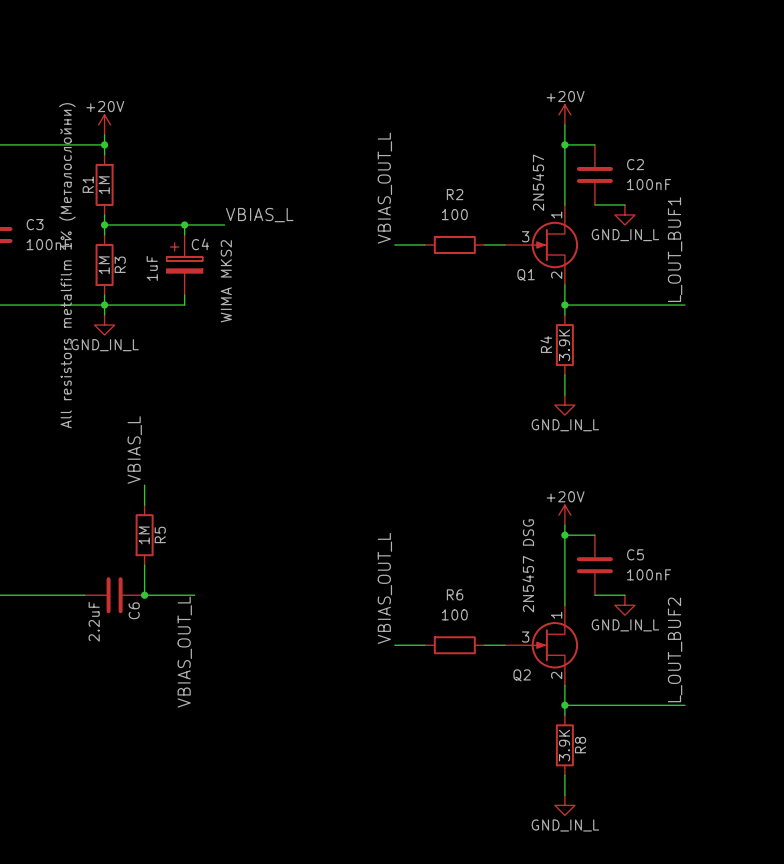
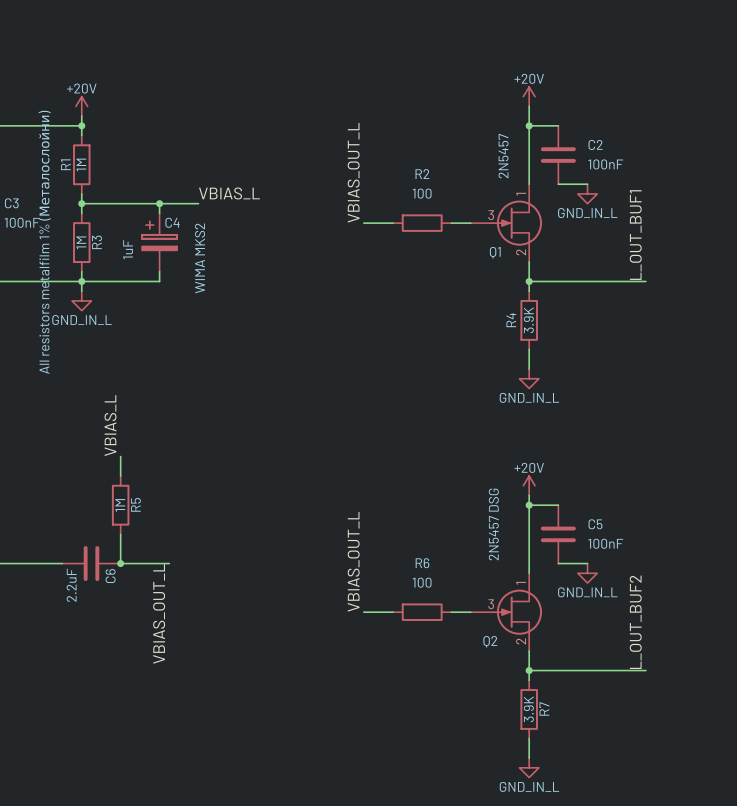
R8 name: R8 (580, 745) -> R7 (544, 708)

